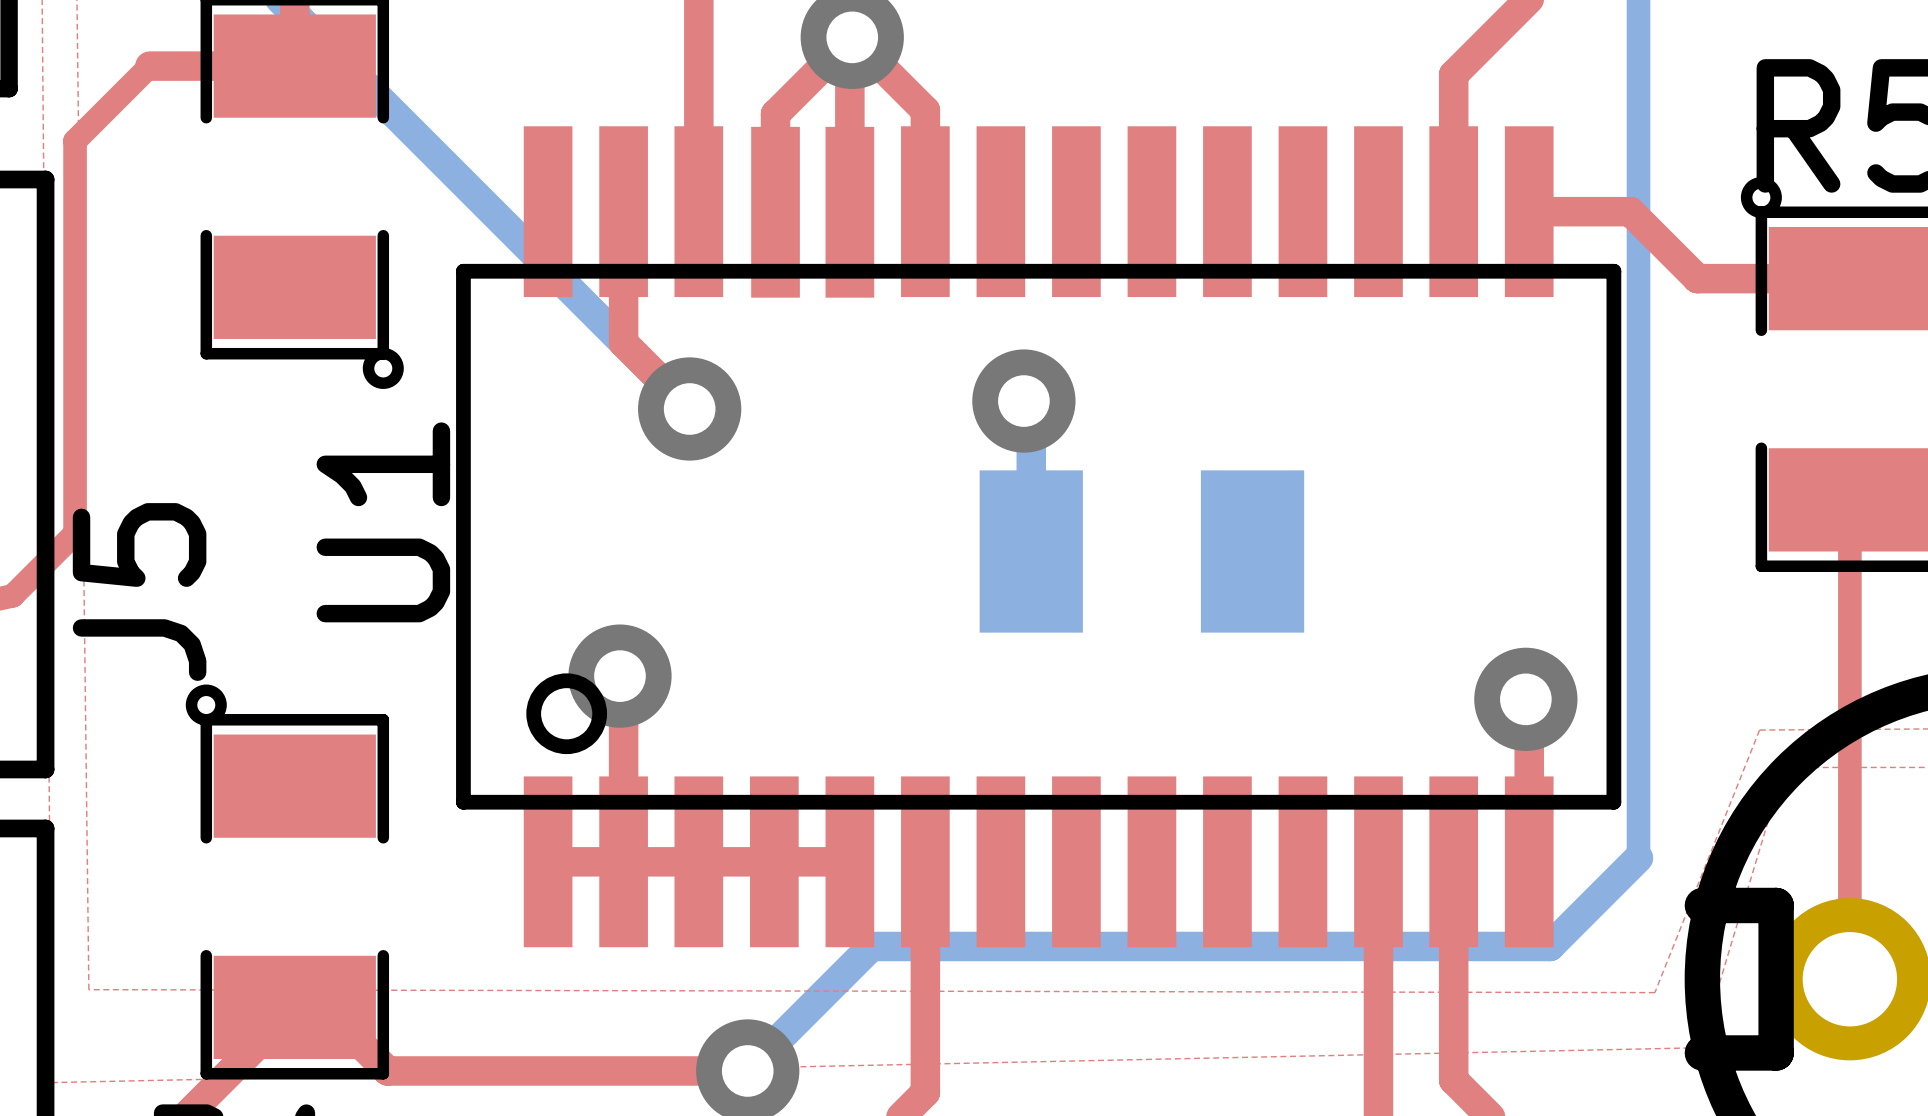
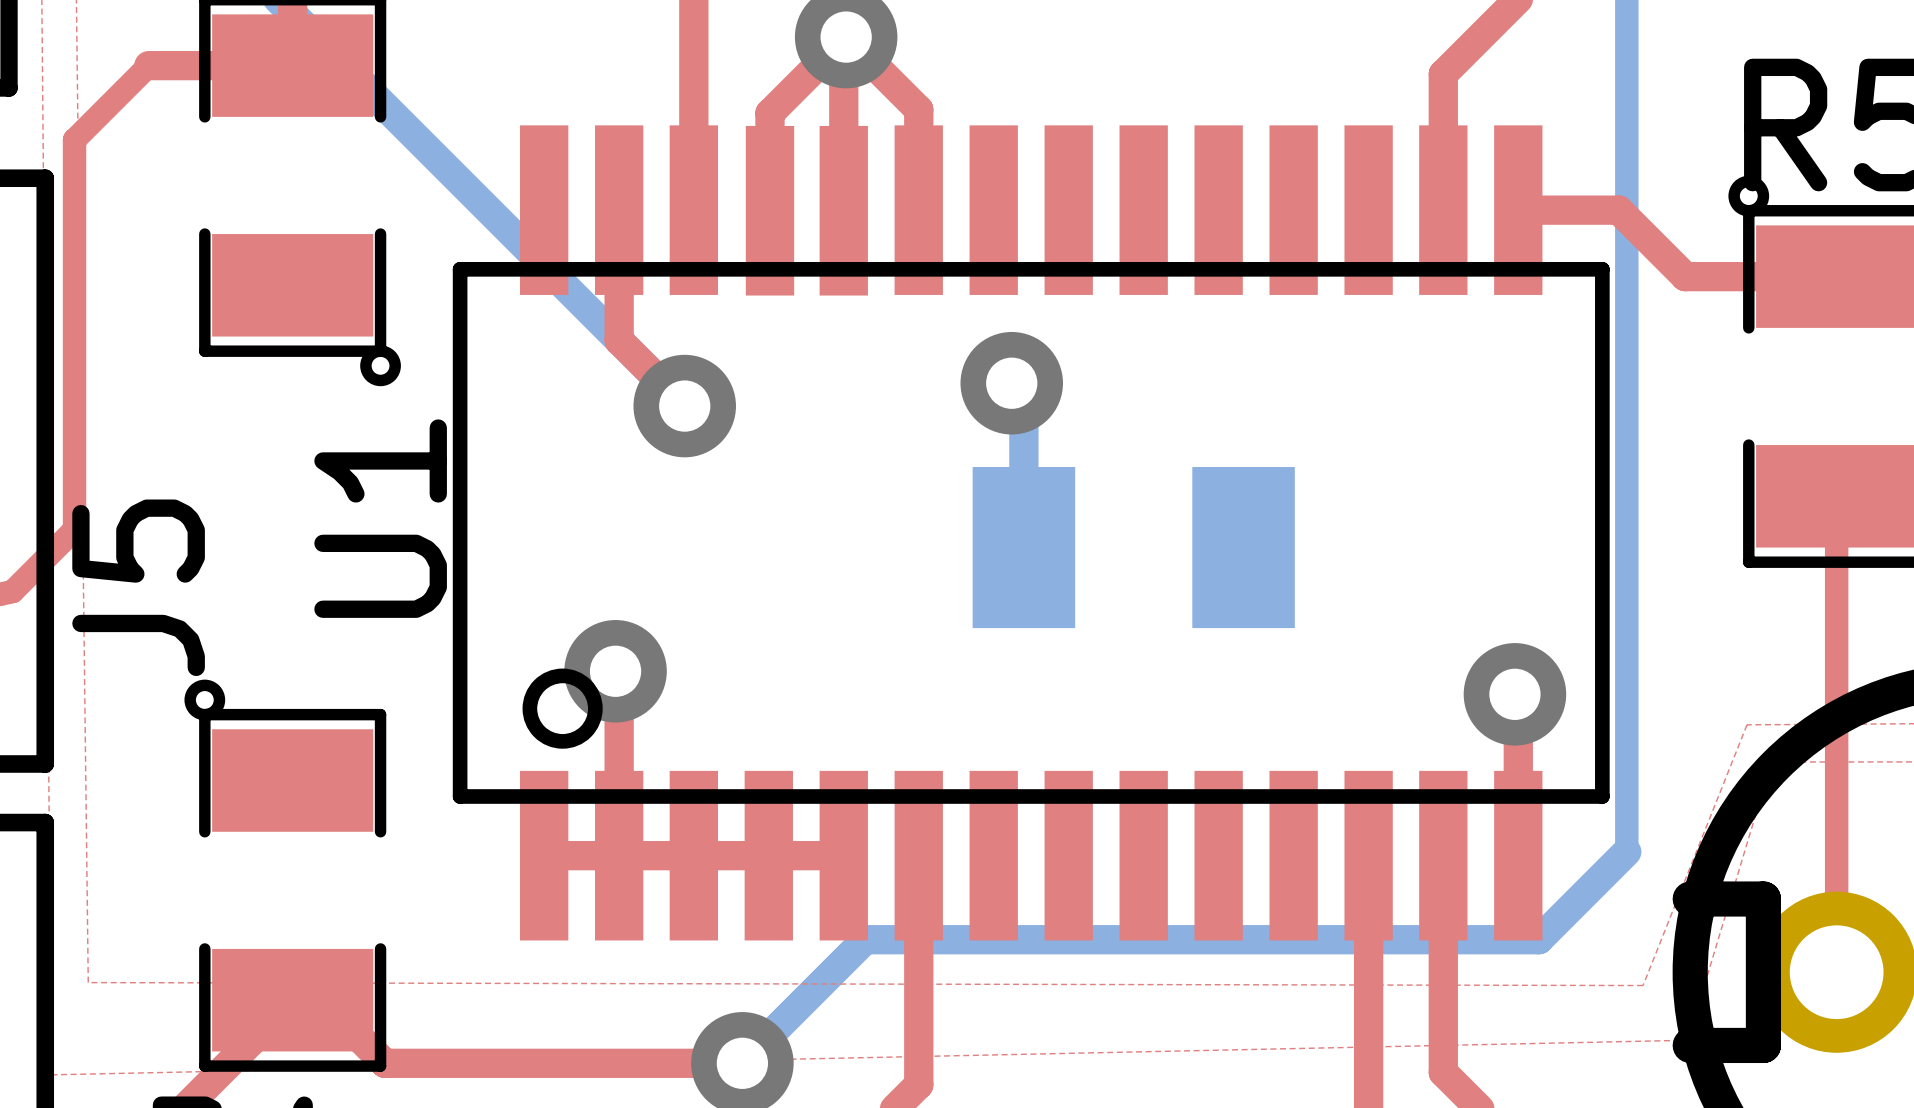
via position: (1023, 401) -> (1011, 383)

